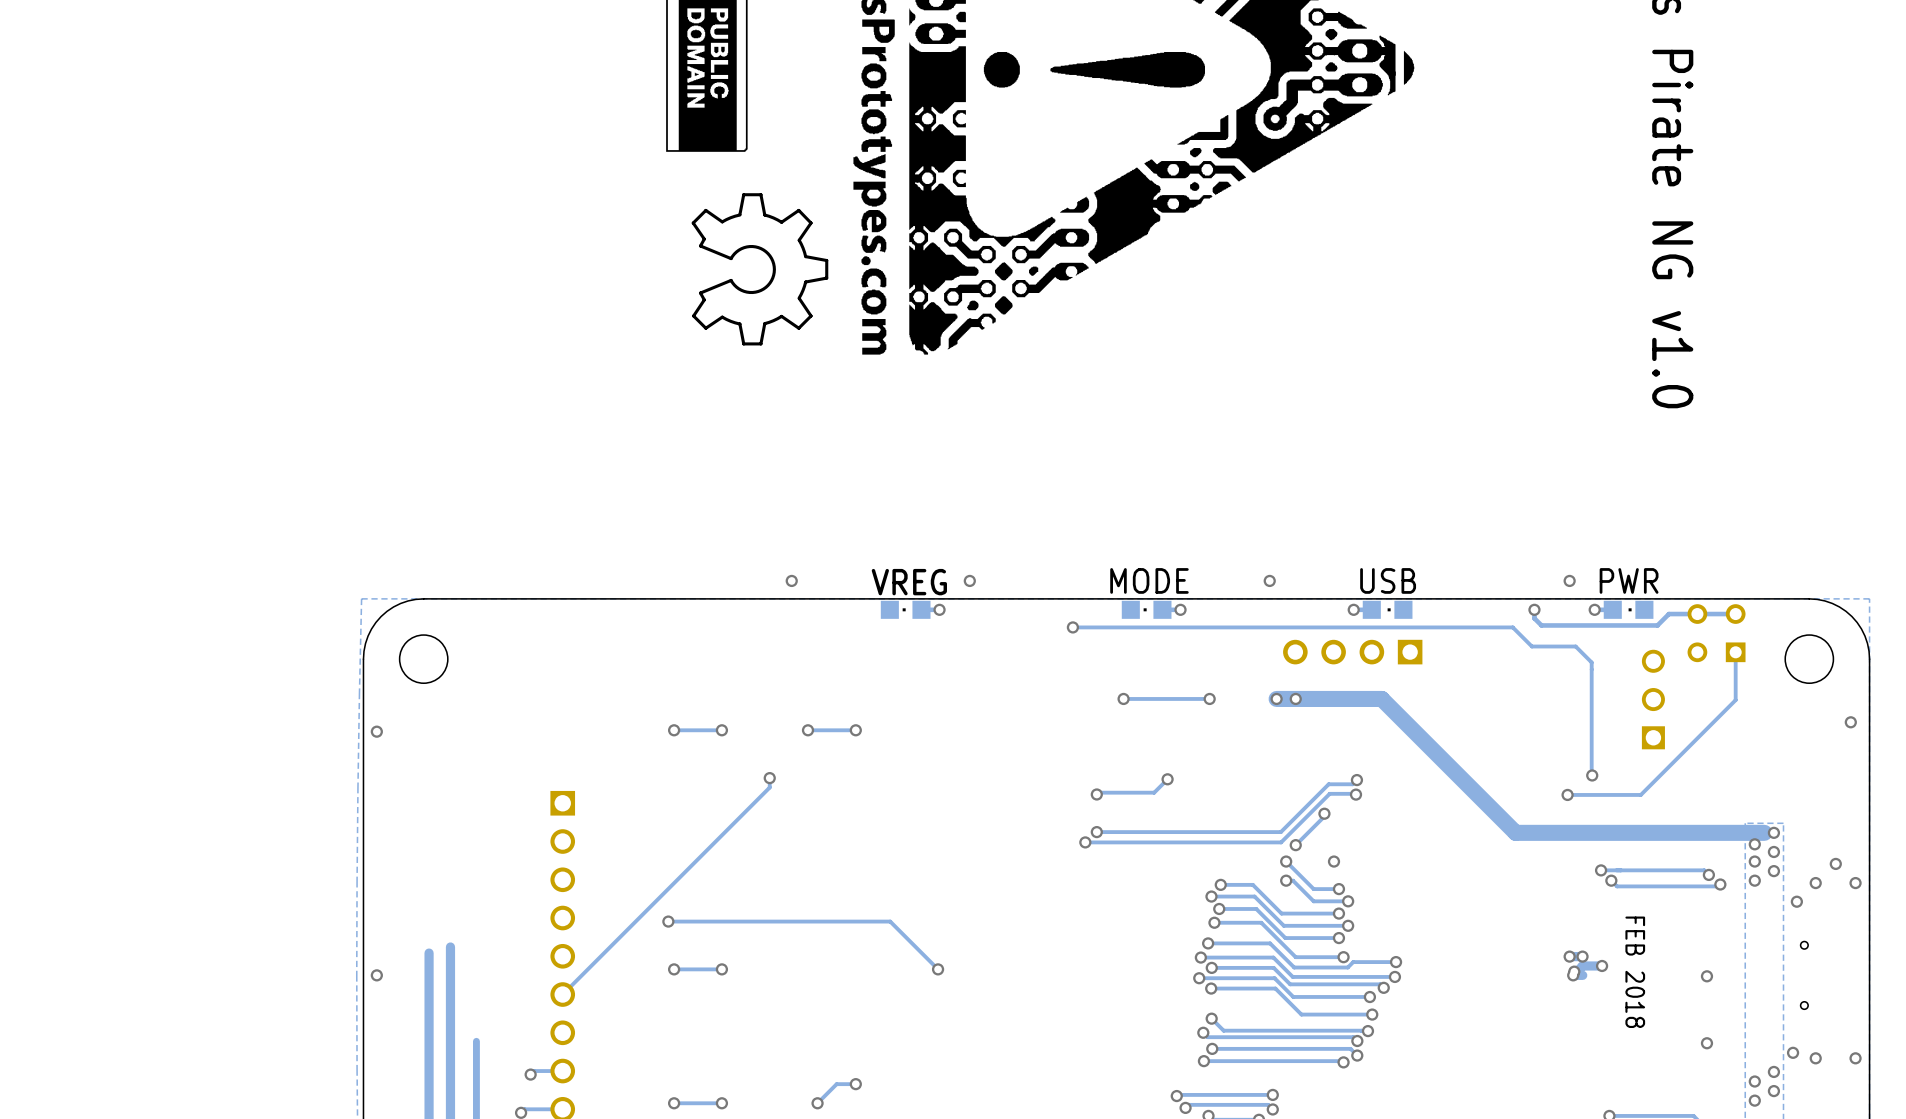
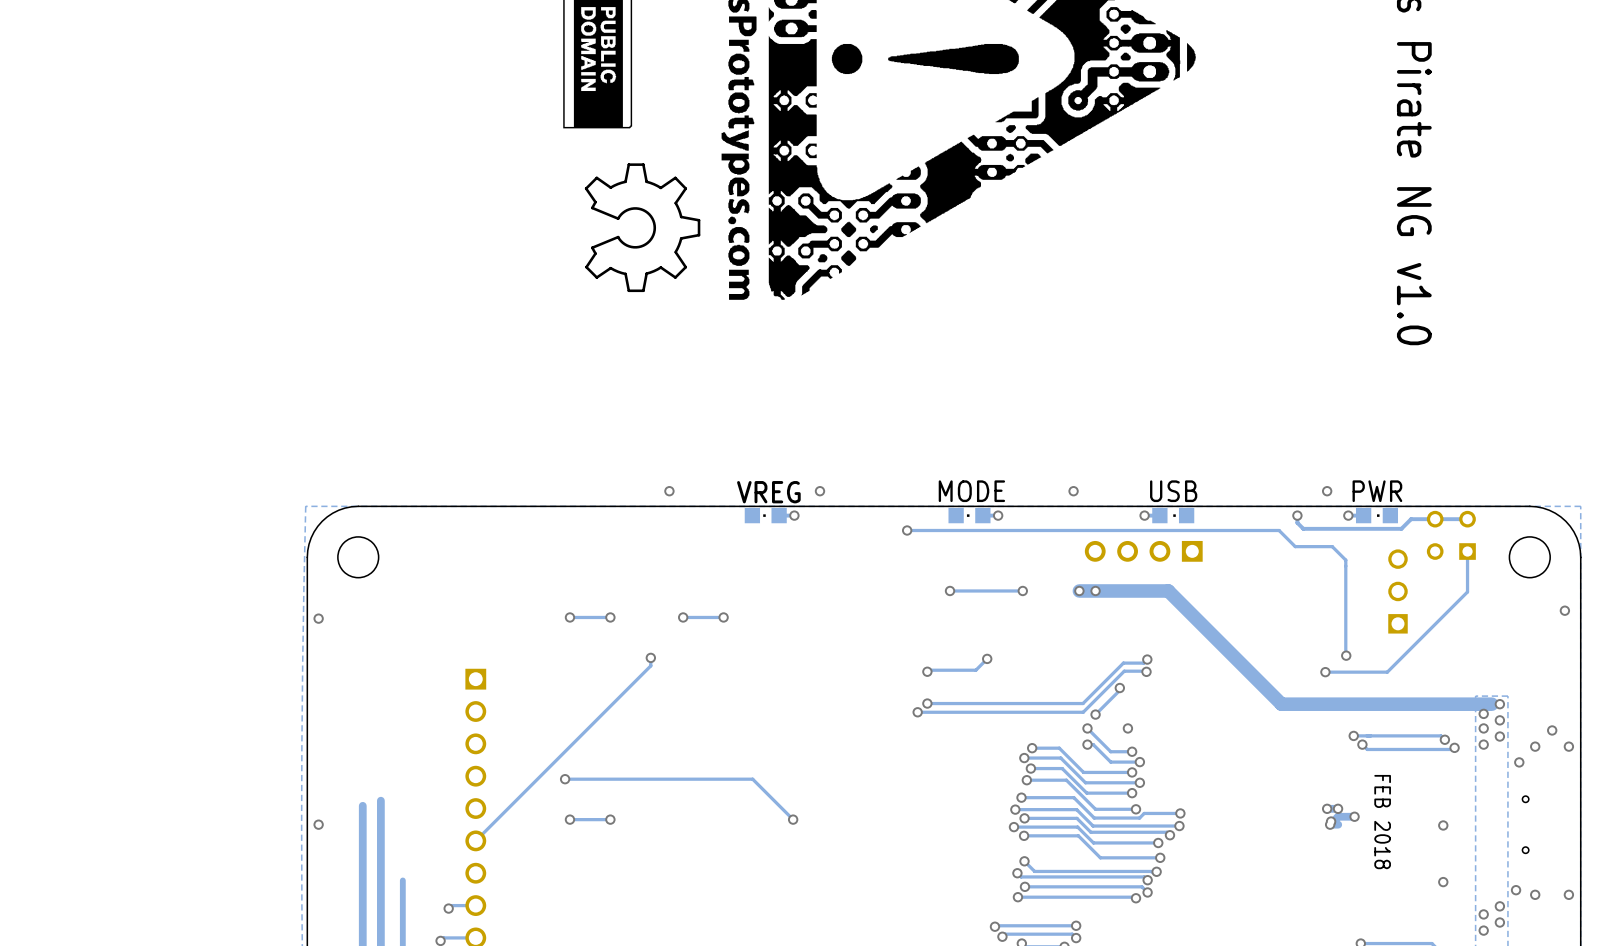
track: (855, 1084) (836, 1084) (817, 1103) -> none
via: (855, 1084) -> none
via: (674, 1103) -> none
track: (721, 1103) (674, 1103) -> none
via: (721, 1103) -> none
via: (817, 1103) -> none

